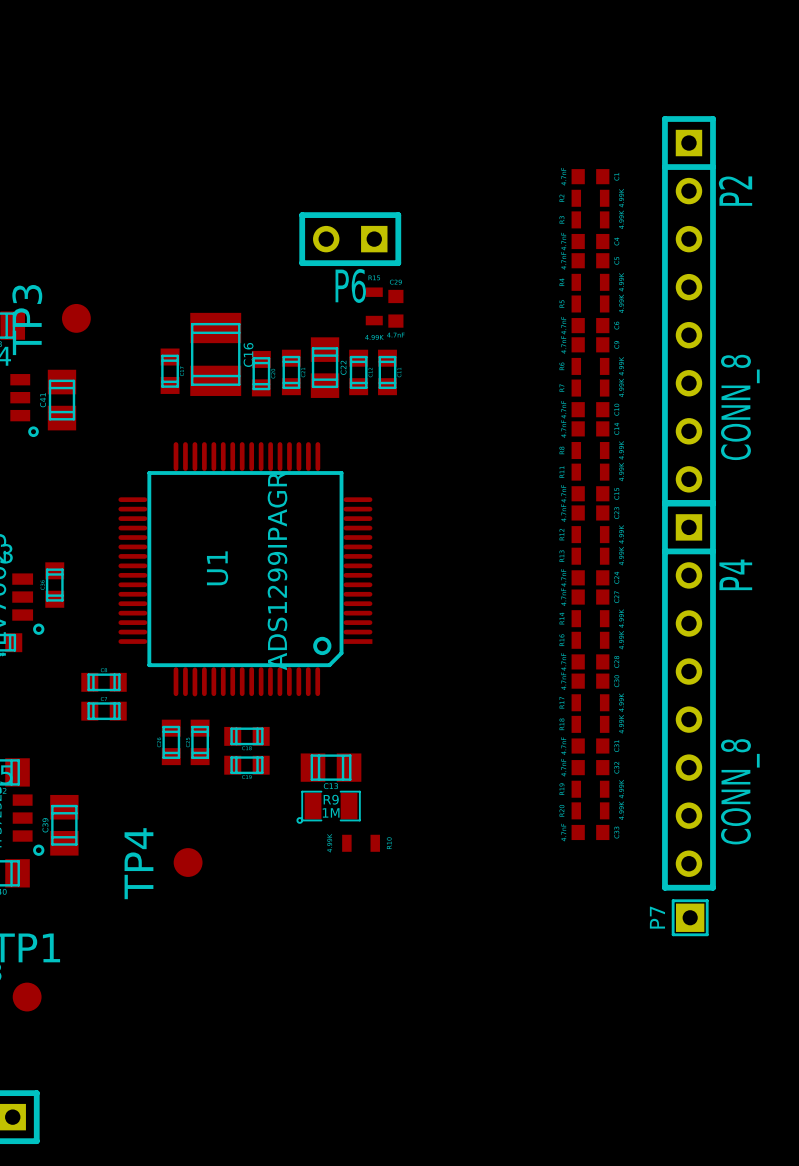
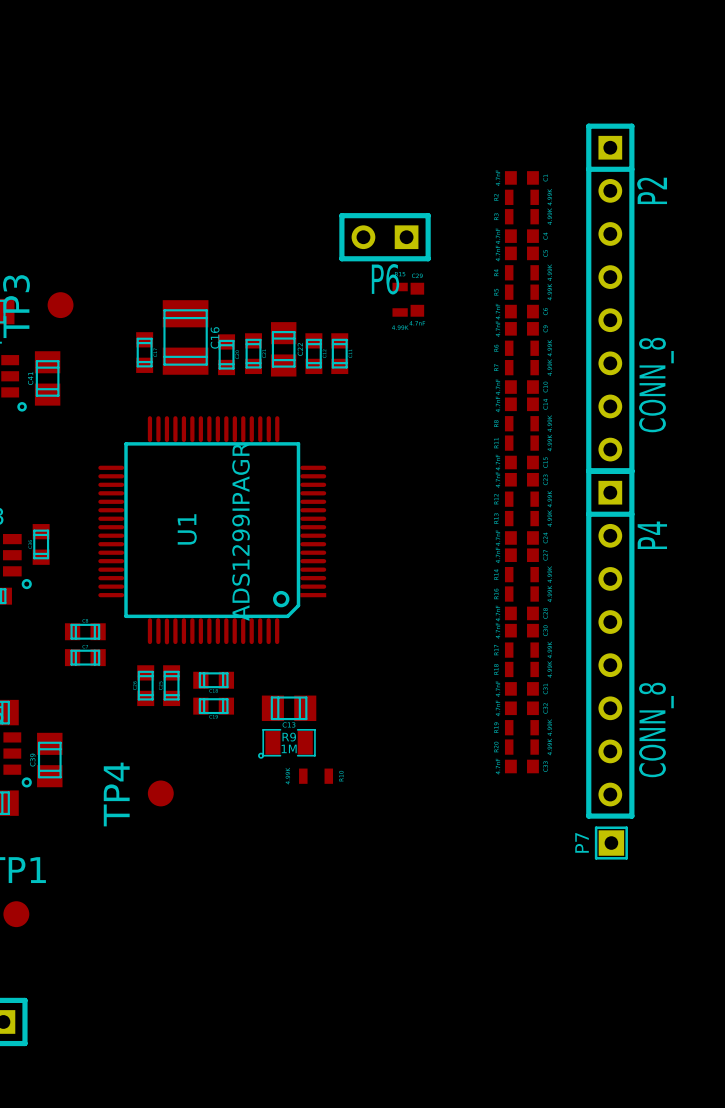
P6 position: (350, 239) -> (385, 237)
part position: (374, 306) -> (400, 299)
part position: (395, 308) -> (417, 299)

